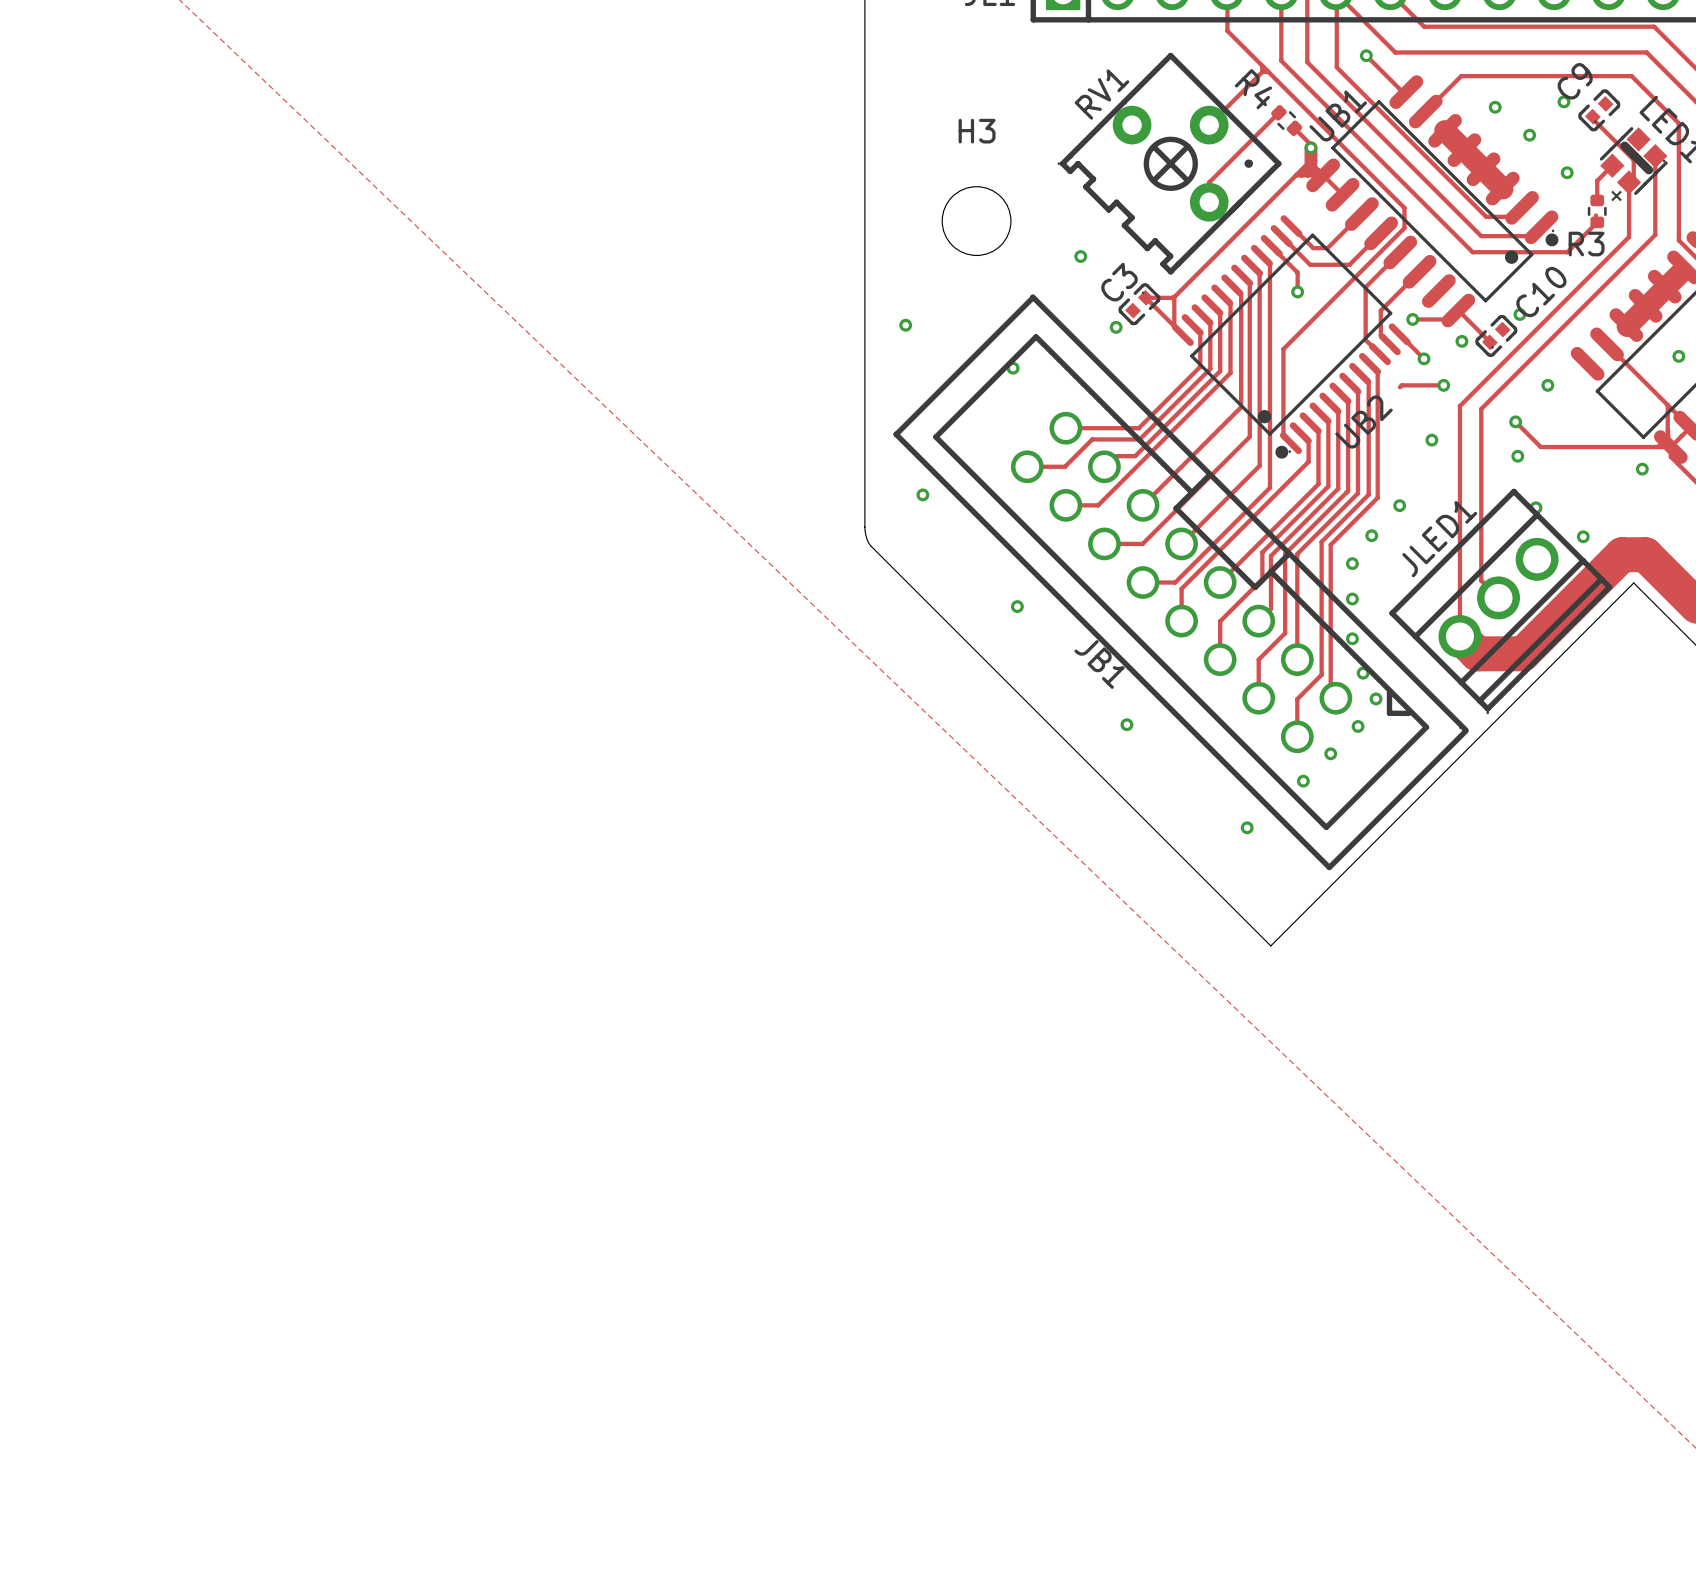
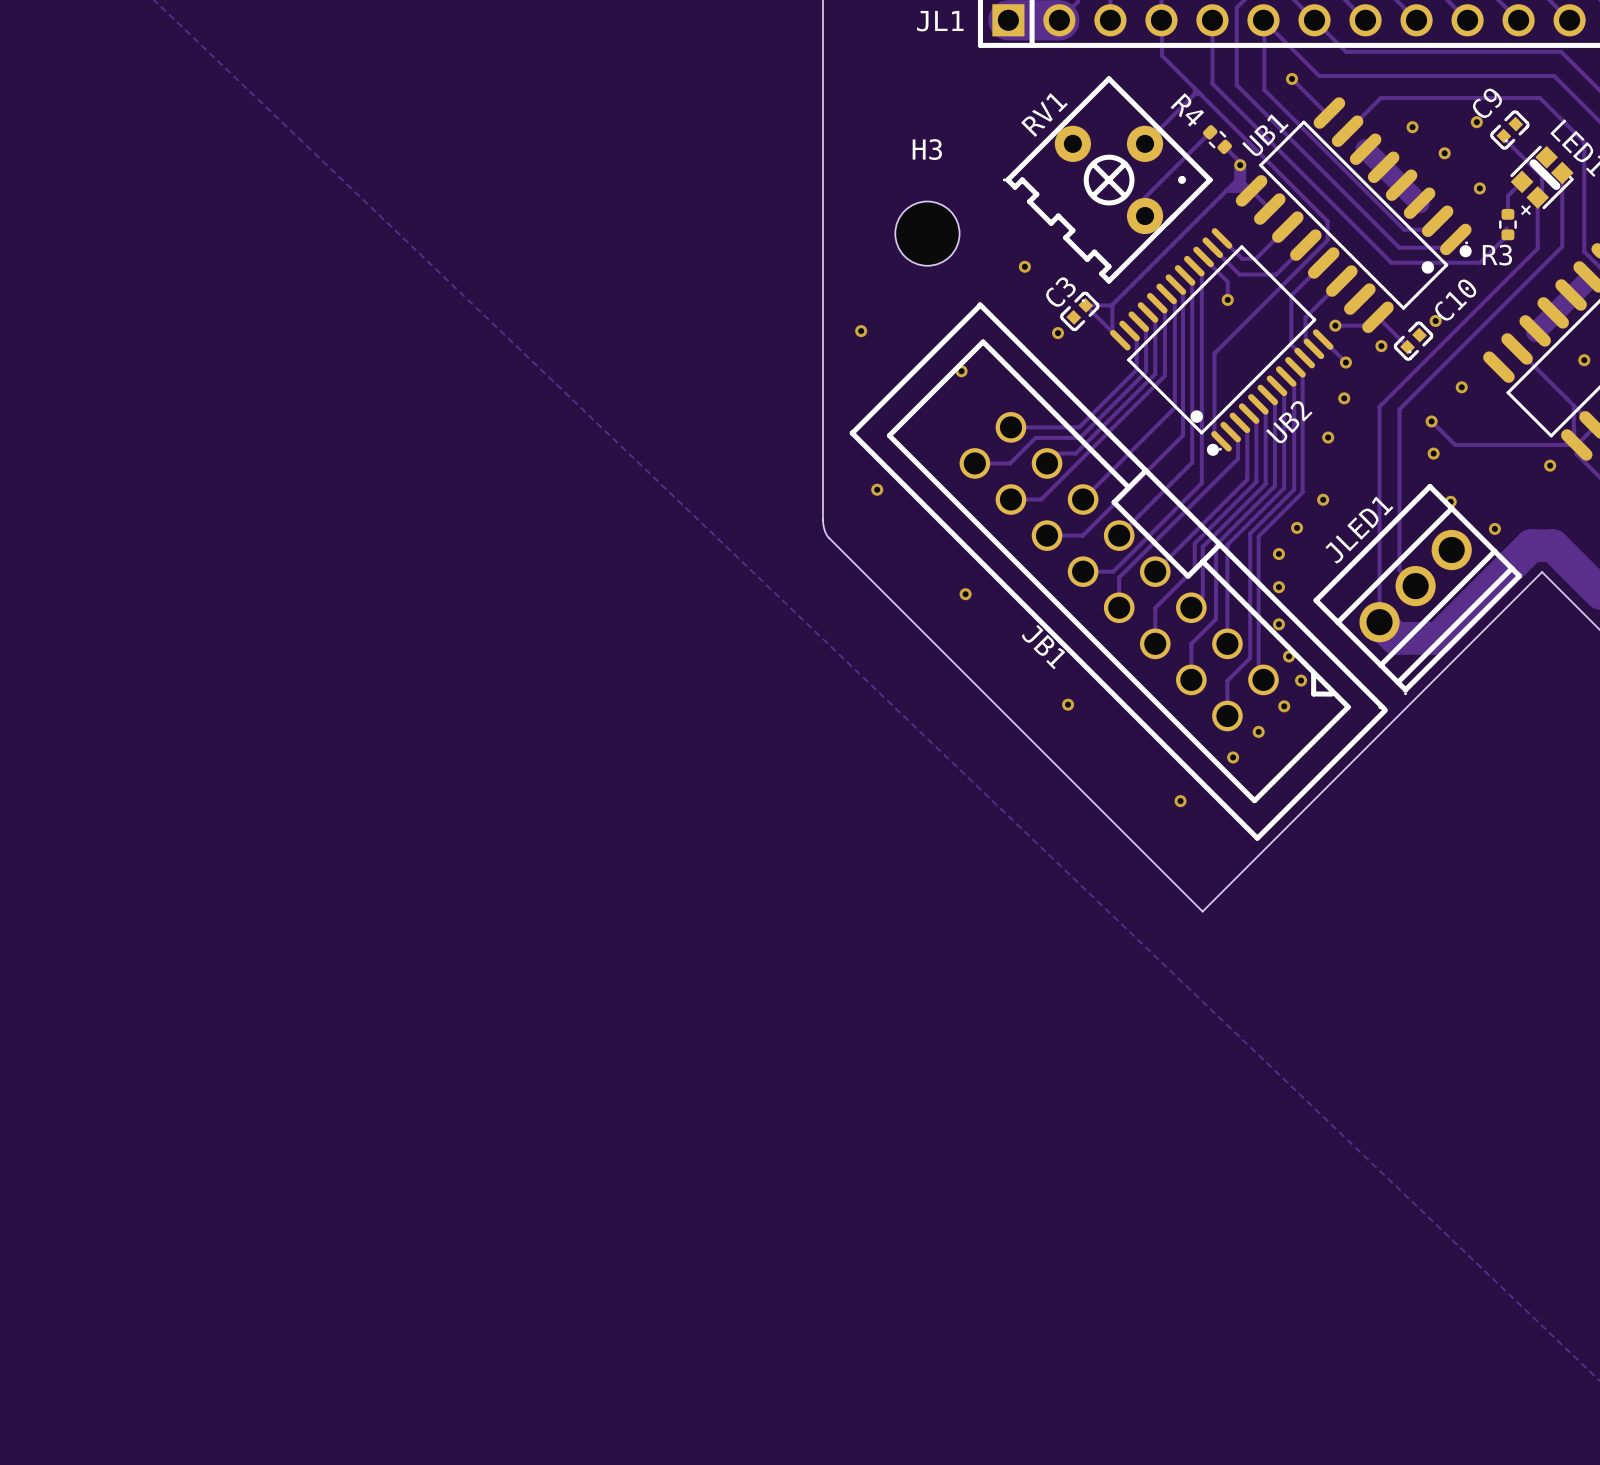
track: (1443, 385) (1401, 385) (1399, 387) -> none
via: (1443, 385) -> none
via: none -> (1344, 398)
via: none -> (1328, 437)
via: (1431, 440) -> none

